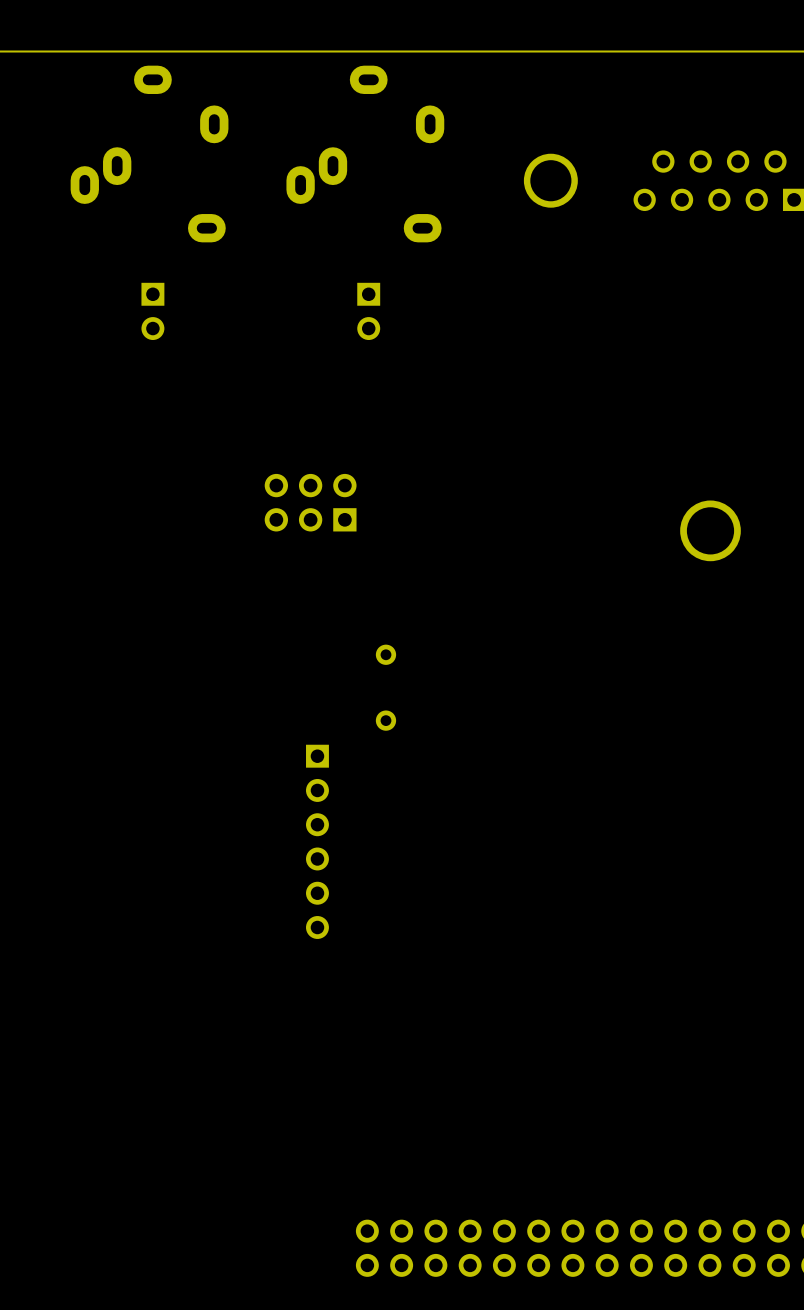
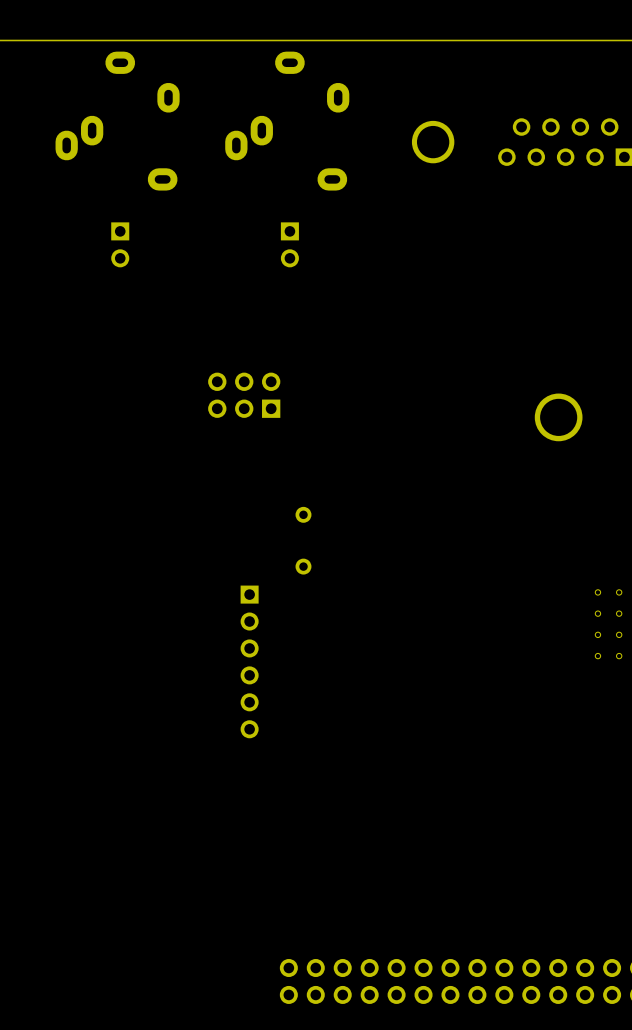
part: none -> (597, 592)
part: none -> (619, 592)
part: none -> (597, 613)
part: none -> (619, 613)
part: none -> (597, 634)
part: none -> (619, 634)
part: none -> (597, 656)
part: none -> (619, 656)

